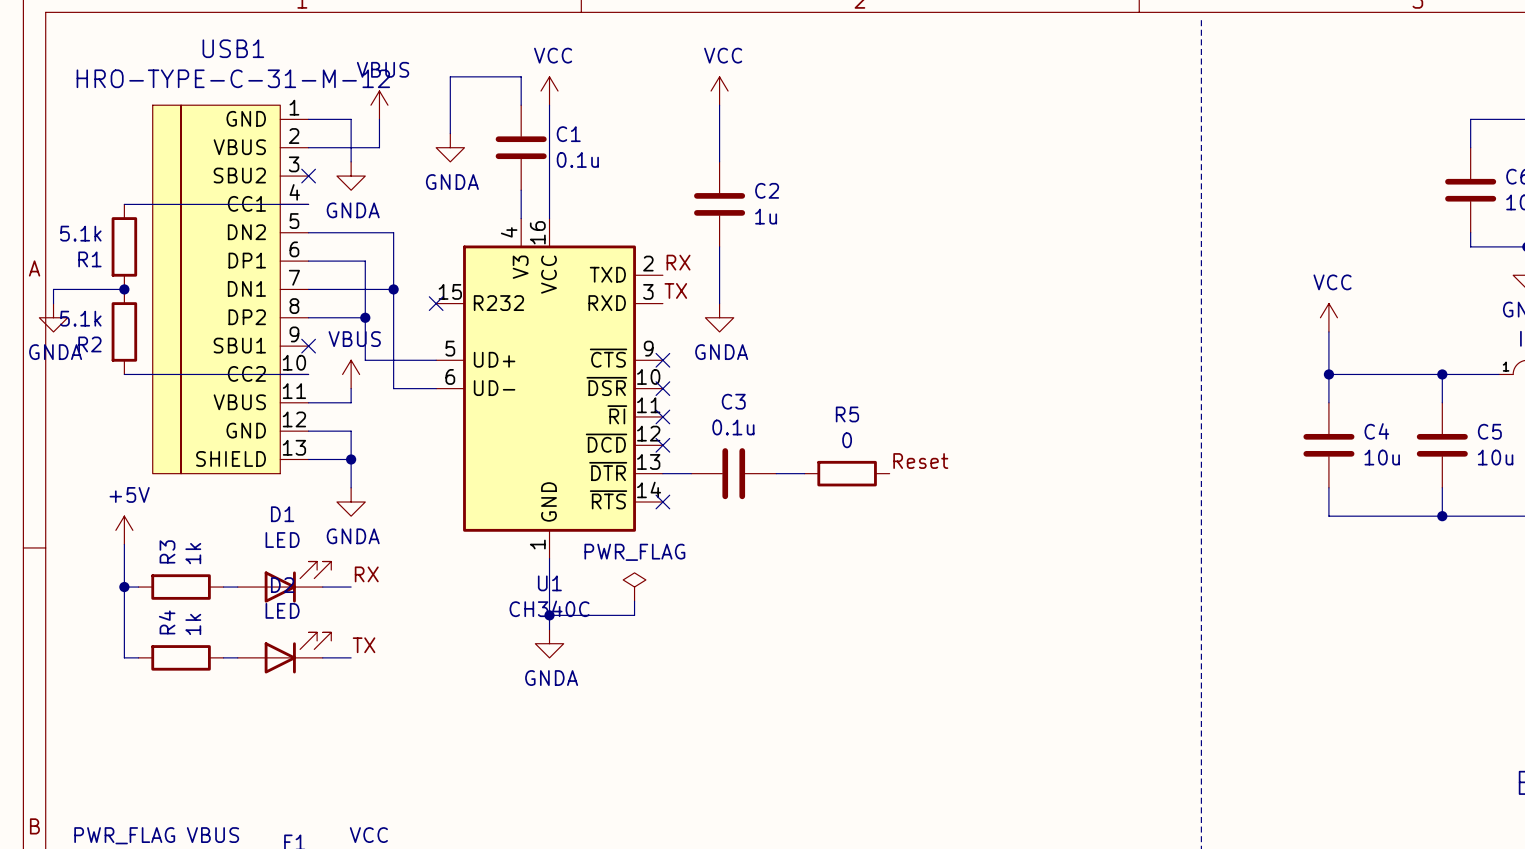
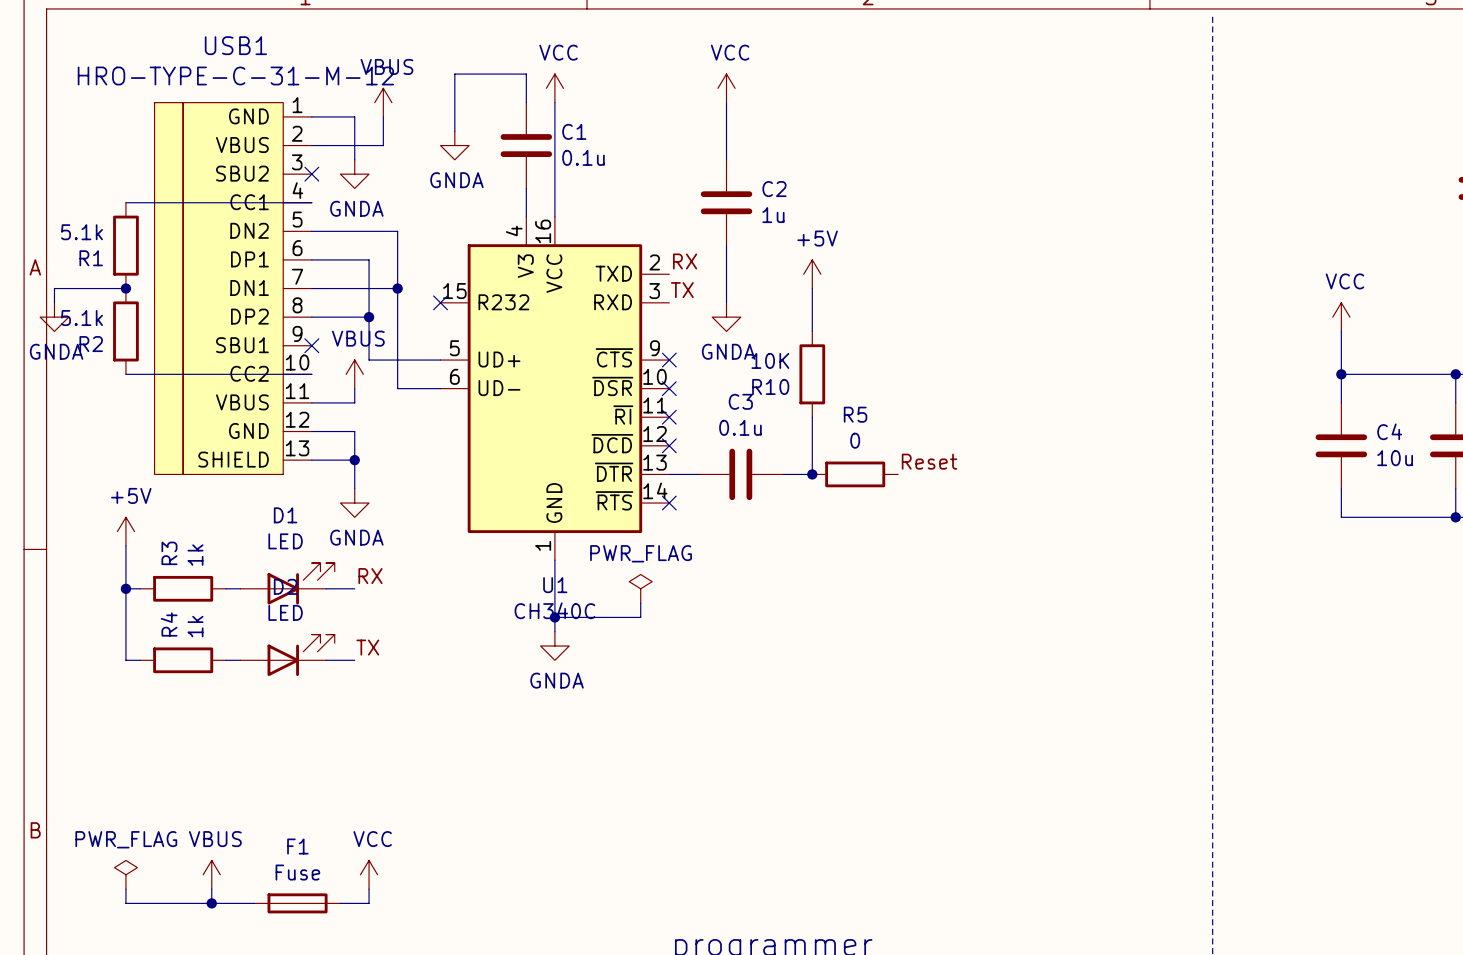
power symbol: none -> +5V (812, 274)
wire: none -> (812, 288) (812, 331)
R10: none -> 10K (812, 374)
wire: none -> (812, 417) (812, 474)
junction: none -> (812, 474)

